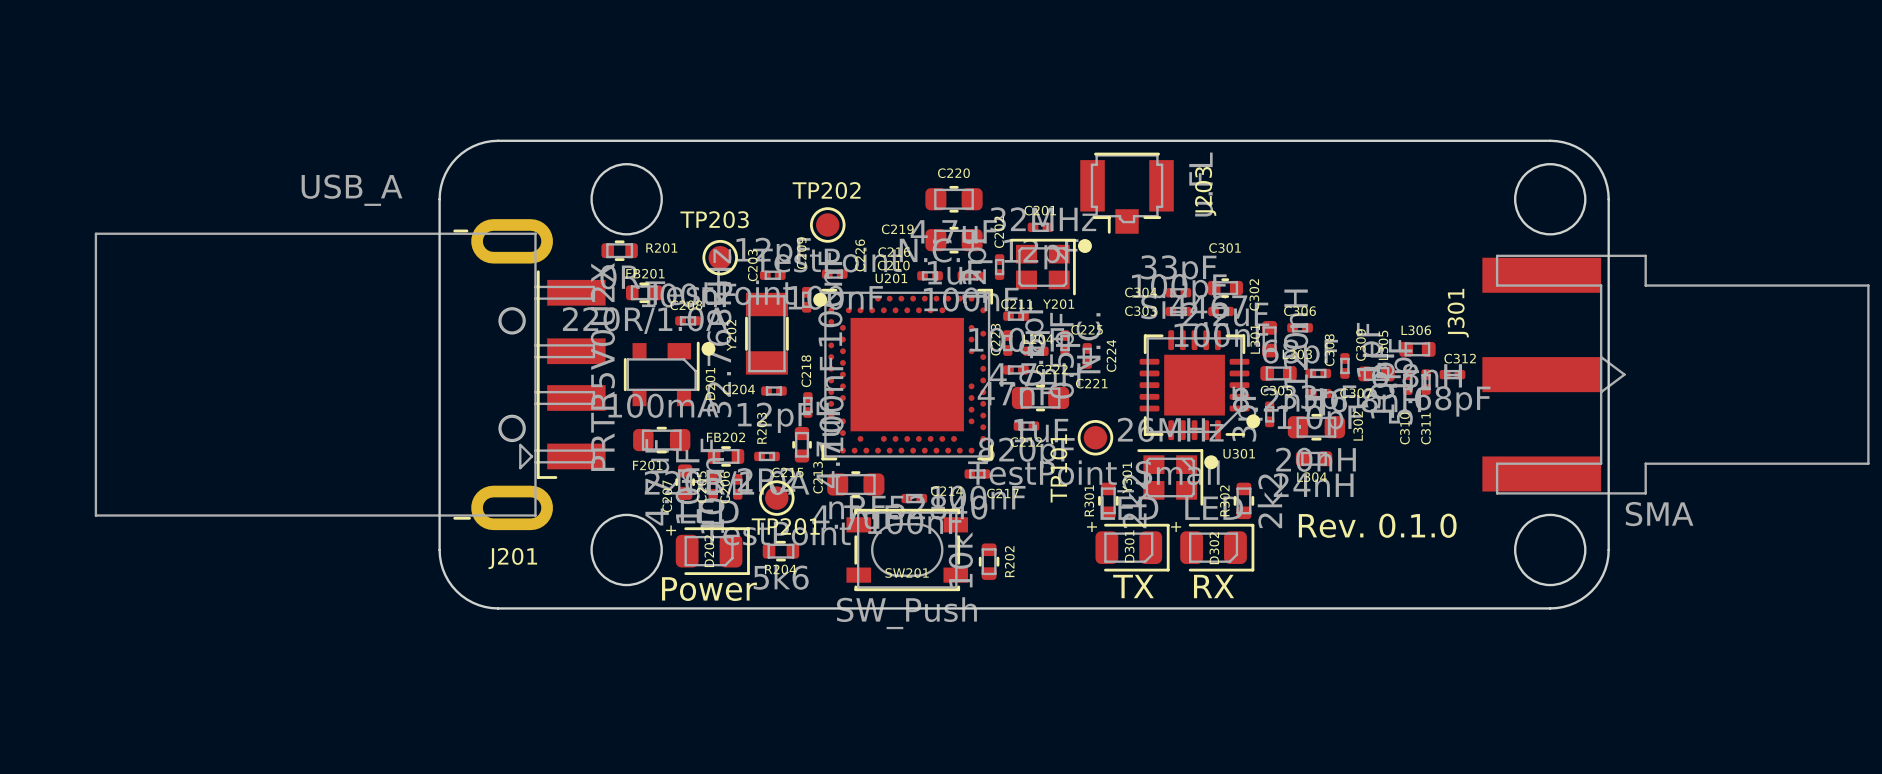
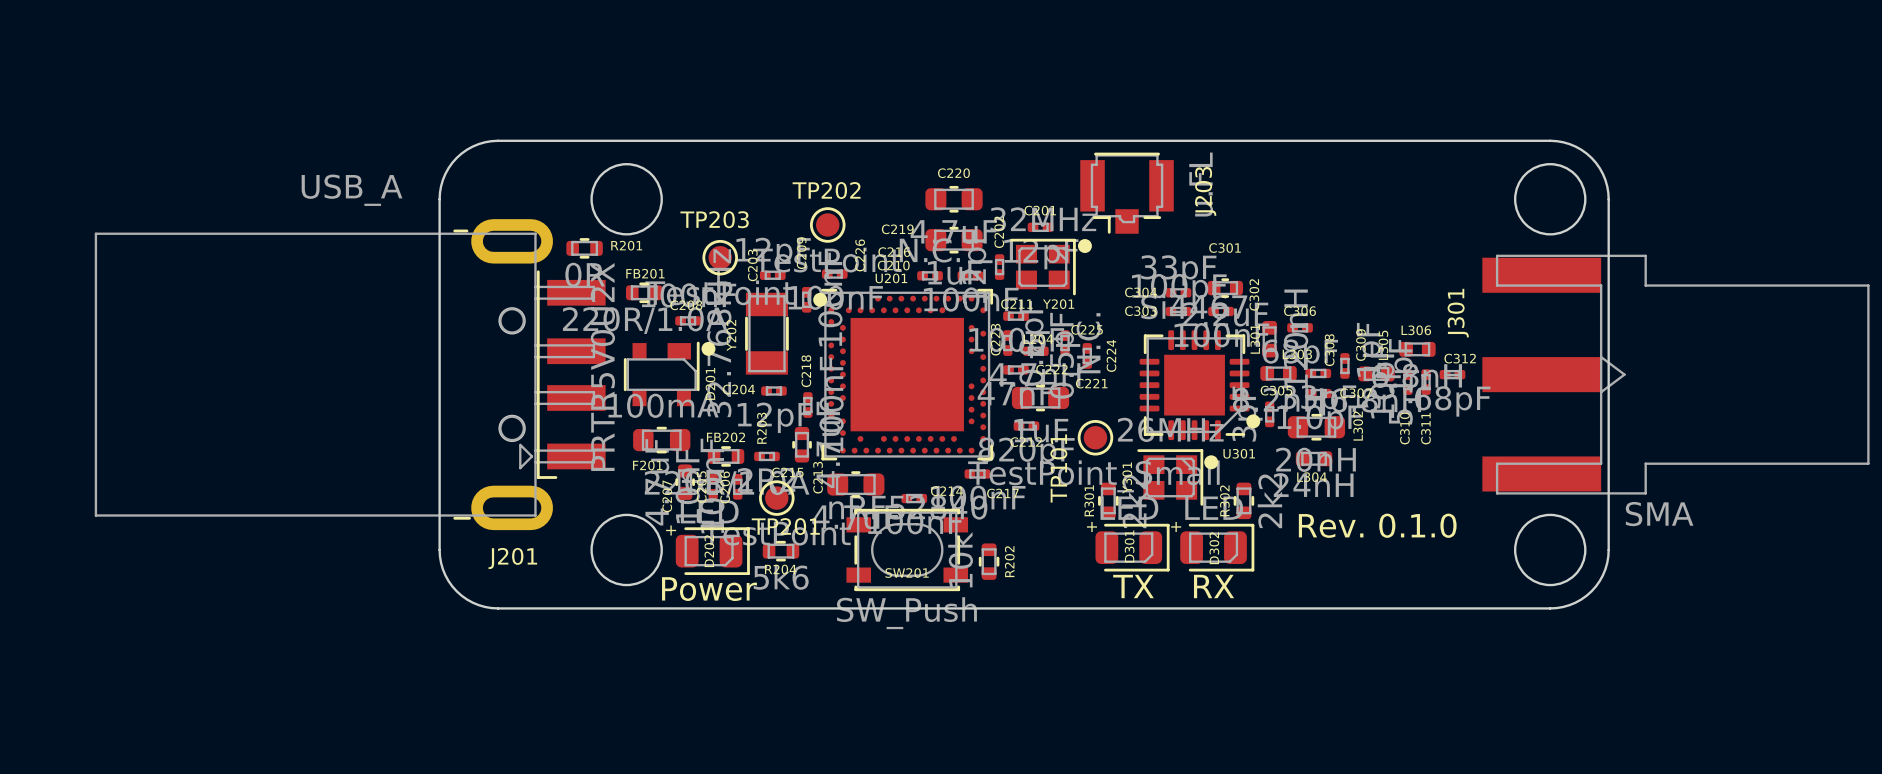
R201 position: (619, 250) -> (584, 248)

